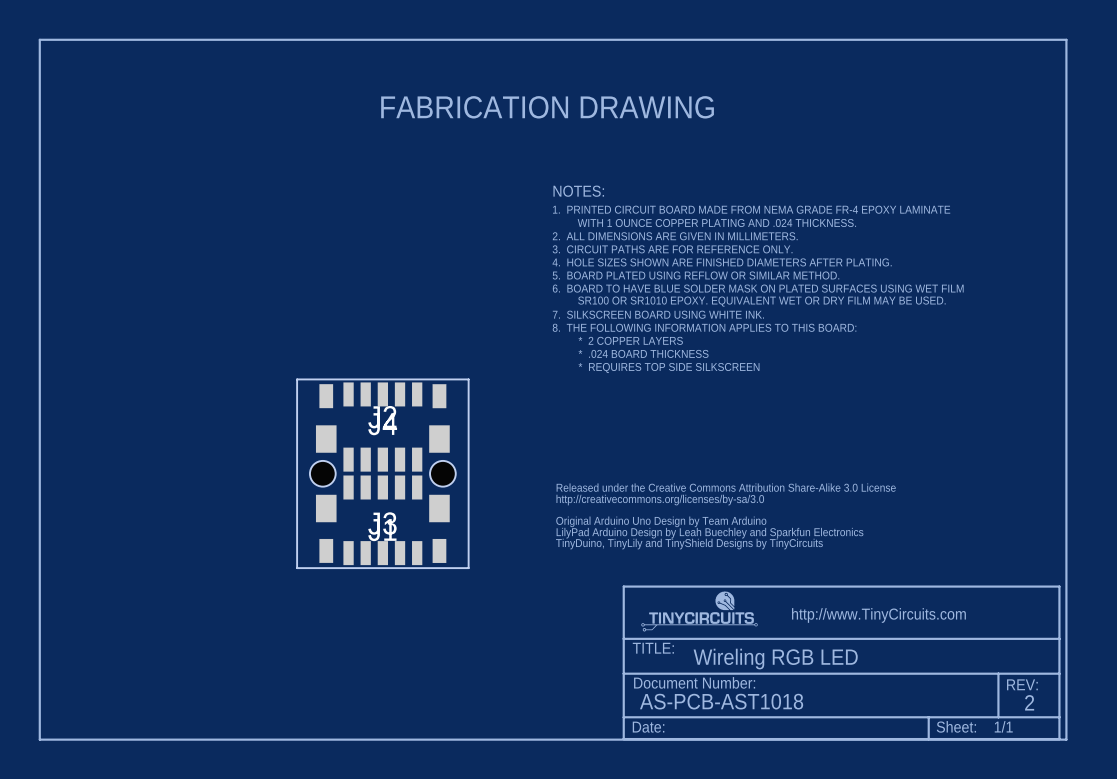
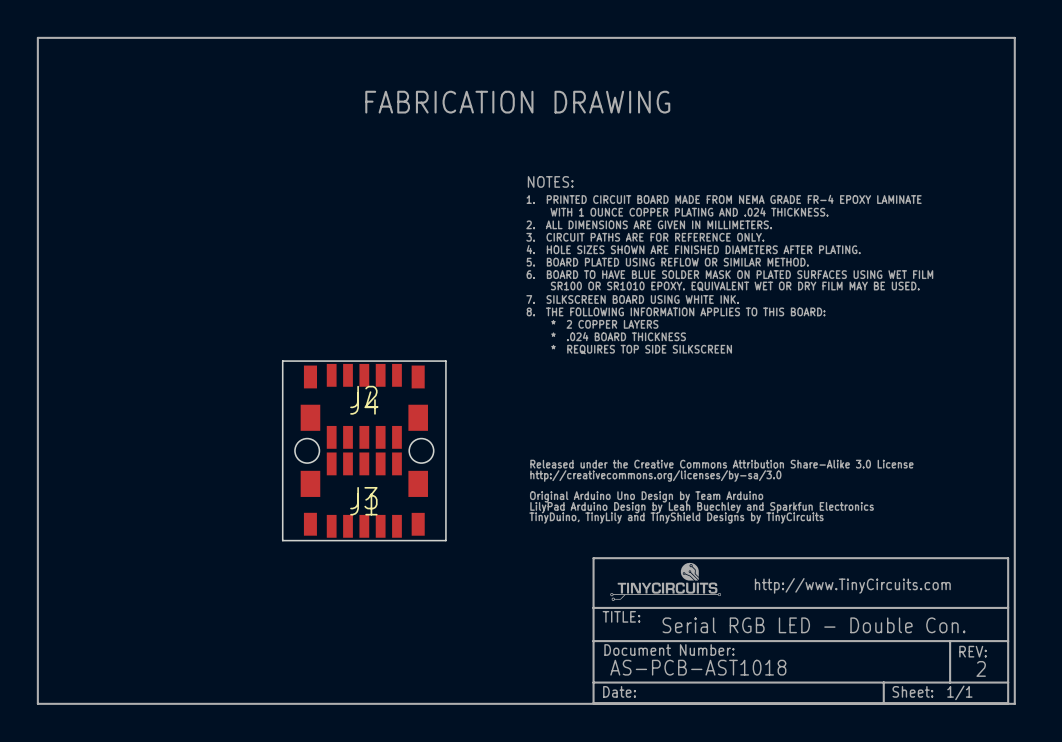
text: Wireling RGB LED (775, 659) -> Serial RGB LED - Double Con. (814, 625)

